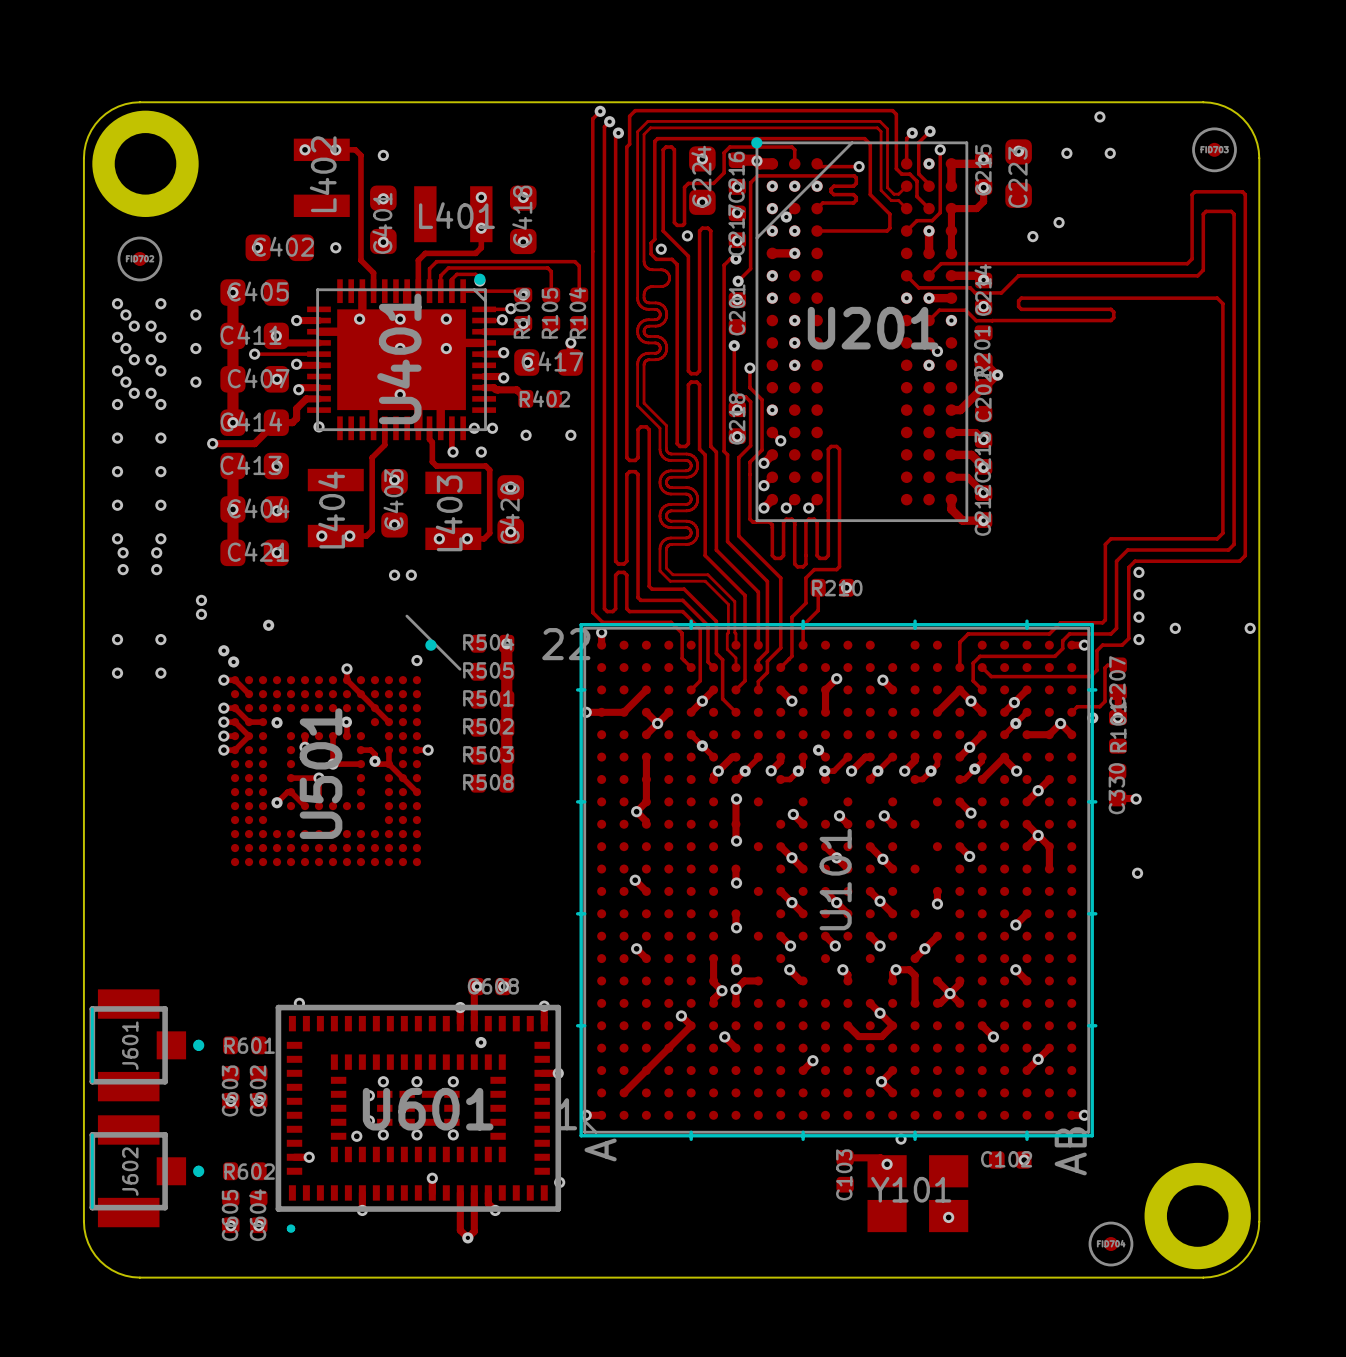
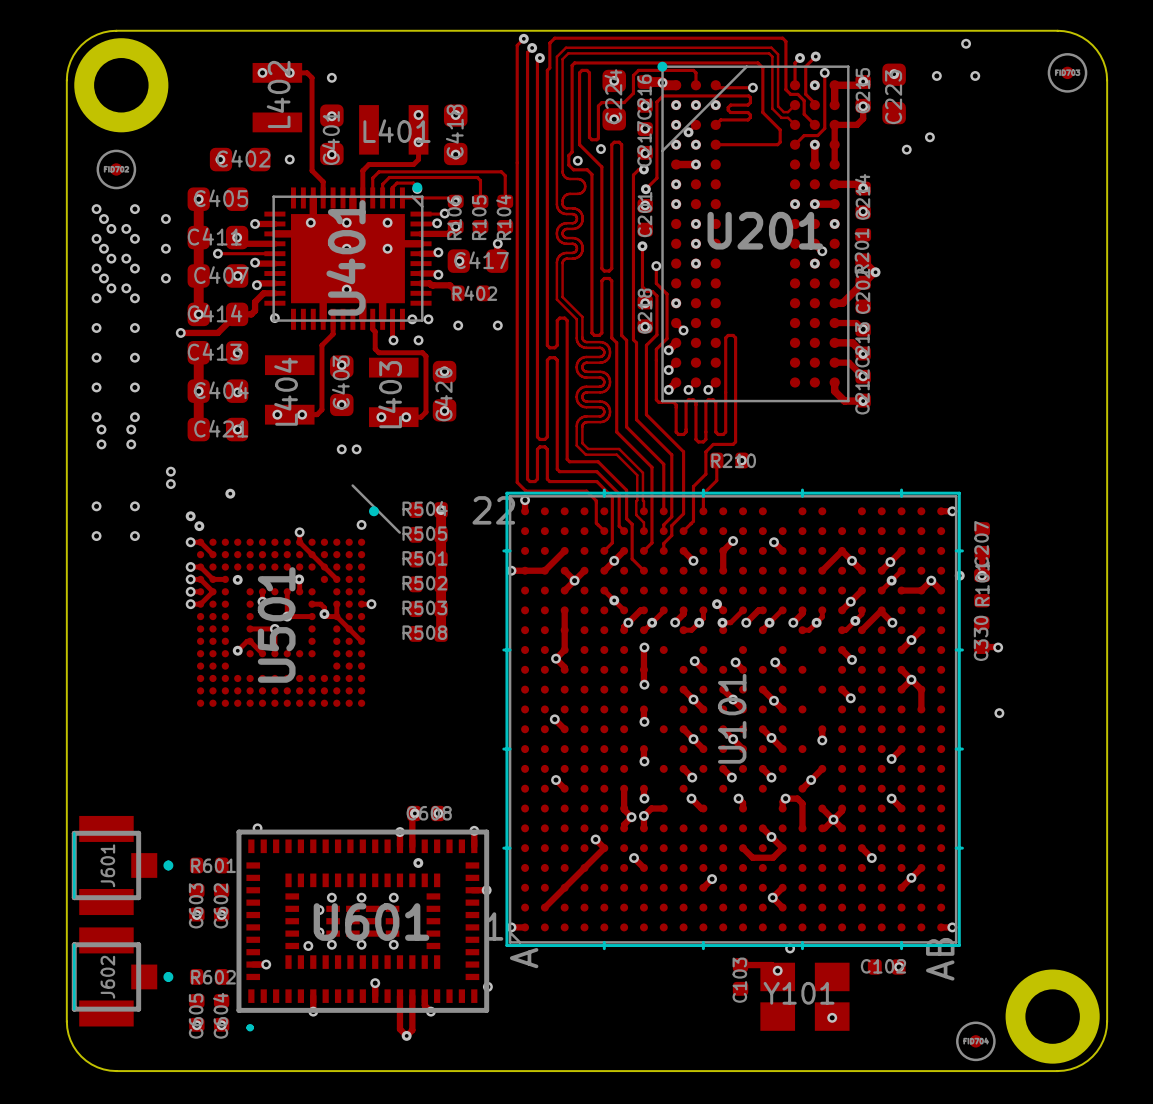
track: (906, 275) (918, 287) (970, 287) (975, 292) (1001, 292) (1018, 275) (1197, 275) (1203, 270) (1203, 214) (1206, 211) (1231, 211) (1234, 214) (1234, 544) (1228, 550) (1127, 550) (1116, 561) (1116, 628) (1110, 633) (1069, 633) (1062, 640) (1062, 648) (1054, 656) (980, 656) (973, 663) (973, 680) (982, 689) -> none
track: (929, 275) (941, 263) (1187, 263) (1192, 258) (1192, 194) (1194, 191) (1242, 191) (1245, 194) (1245, 555) (1239, 561) (1135, 561) (1128, 567) (1128, 638) (1122, 645) (1102, 645) (1096, 650) (1096, 670) (1090, 676) (991, 676) (982, 667) -> none
track: (929, 320) (939, 310) (965, 310) (976, 320) (992, 320) -> none
track: (992, 320) (1110, 320) (1113, 317) (1113, 312) (1110, 309) (1021, 309) (1018, 306) (1018, 300) (1021, 298) (1217, 298) (1222, 303) (1222, 533) (1217, 538) (1110, 538) (1105, 544) (1105, 619) (1102, 622) (1060, 622) (1049, 633) (968, 633) (959, 642) (959, 667) -> none
via: (1138, 572) -> none
via: (1138, 594) -> none
via: (1138, 617) -> none
via: (1175, 628) -> none
via: (1250, 628) -> none
via: (1138, 639) -> none
track: (1118, 665) (1107, 665) (1104, 667) (1104, 701) (1099, 706) (1077, 706) (1071, 712) -> none

